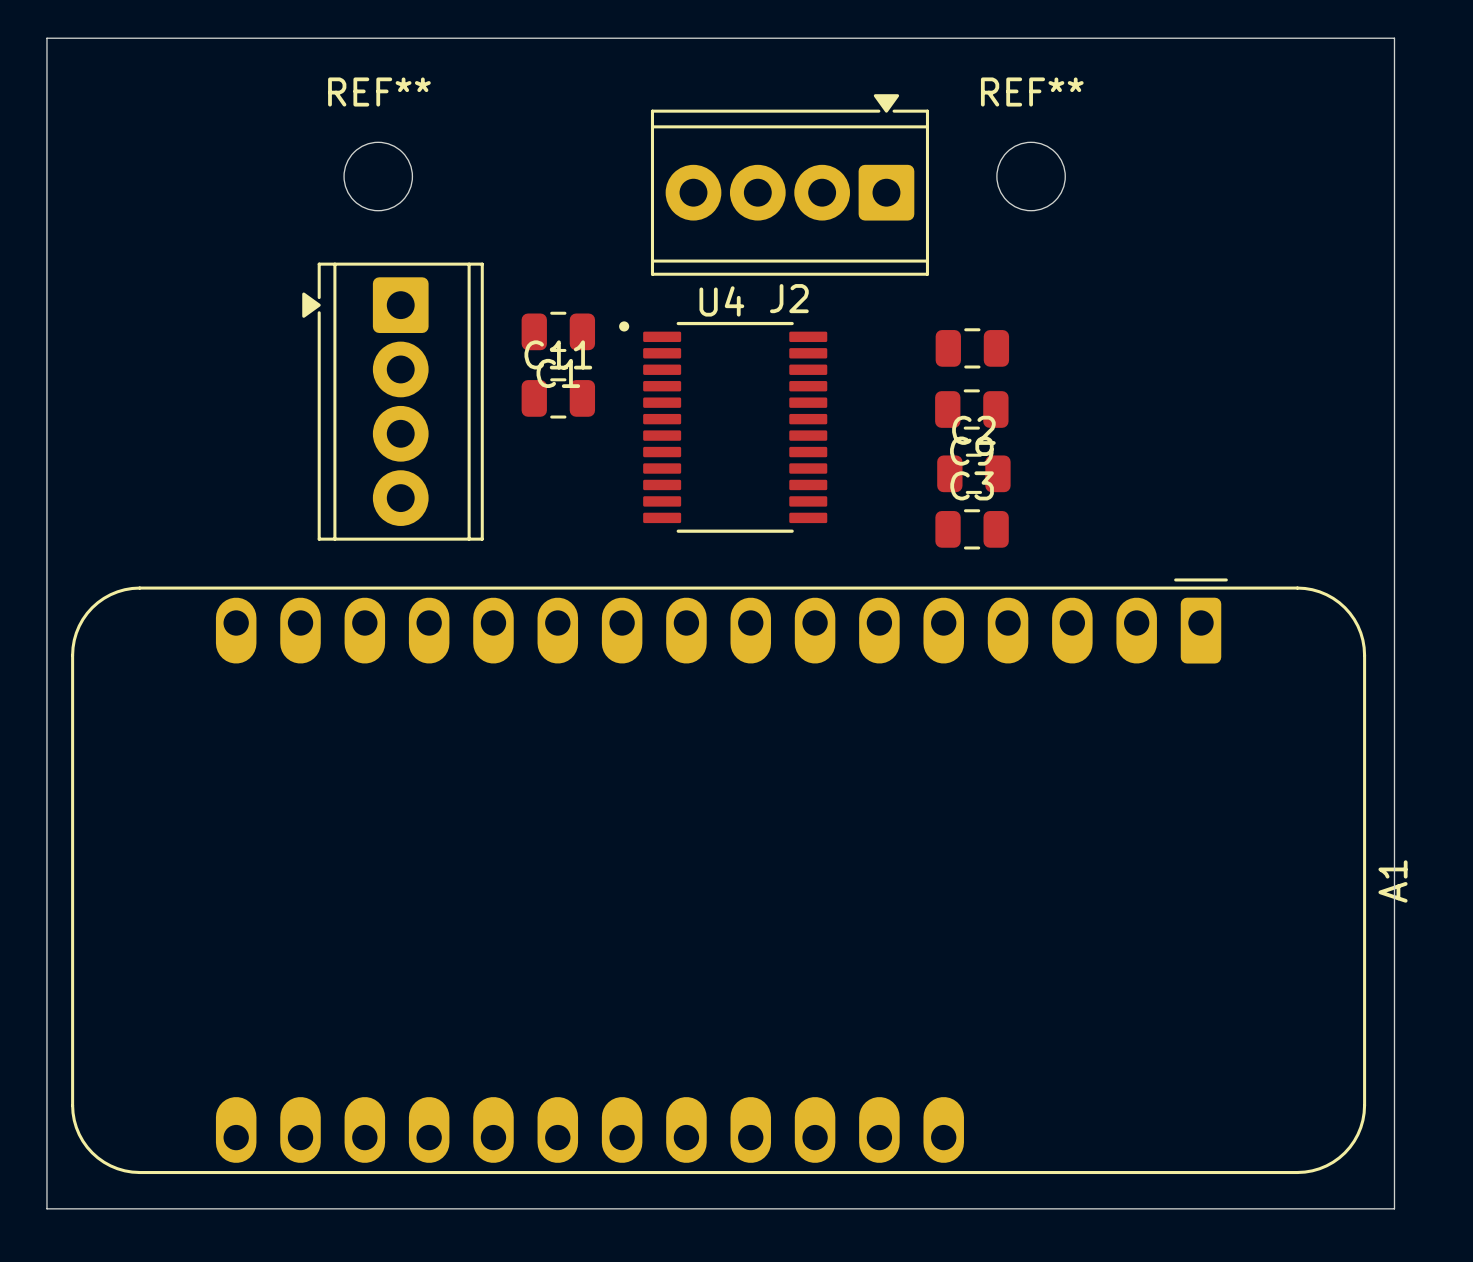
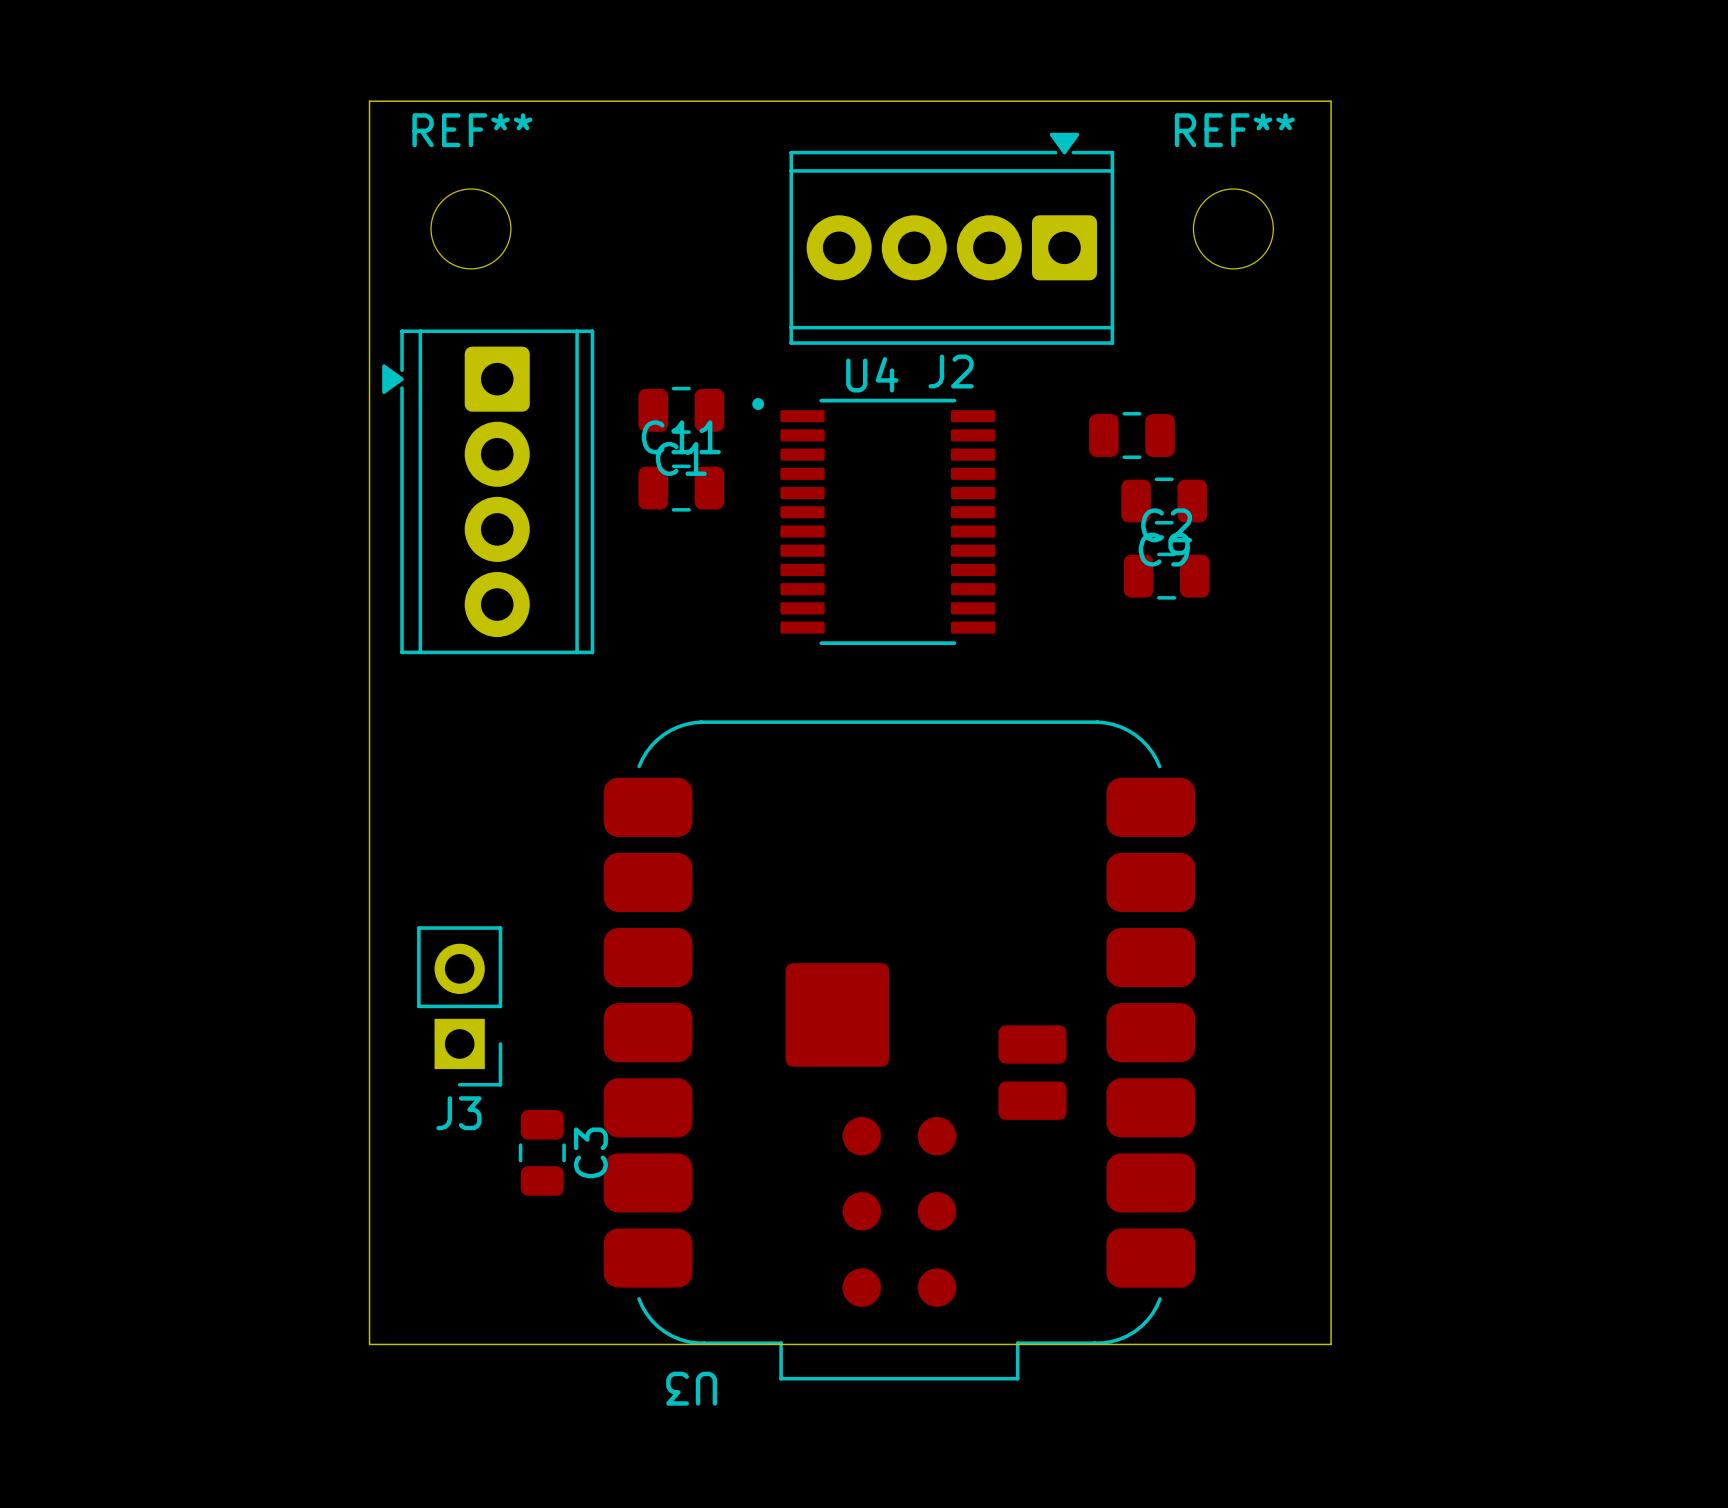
board edge: (46, 38) (1394, 38) (1394, 1208) (46, 1208) (46, 38) -> (369, 101) (369, 1344) (1331, 1344) (1331, 101) (369, 101)
part position: (972, 348) -> (1131, 435)
C3 rotation: 0° (972, 529) -> 90° clockwise (542, 1152)
C3 position: (972, 529) -> (542, 1152)
J3: none -> (459, 1006)
A1: (718, 876) -> none
U3: none -> (899, 1050)

